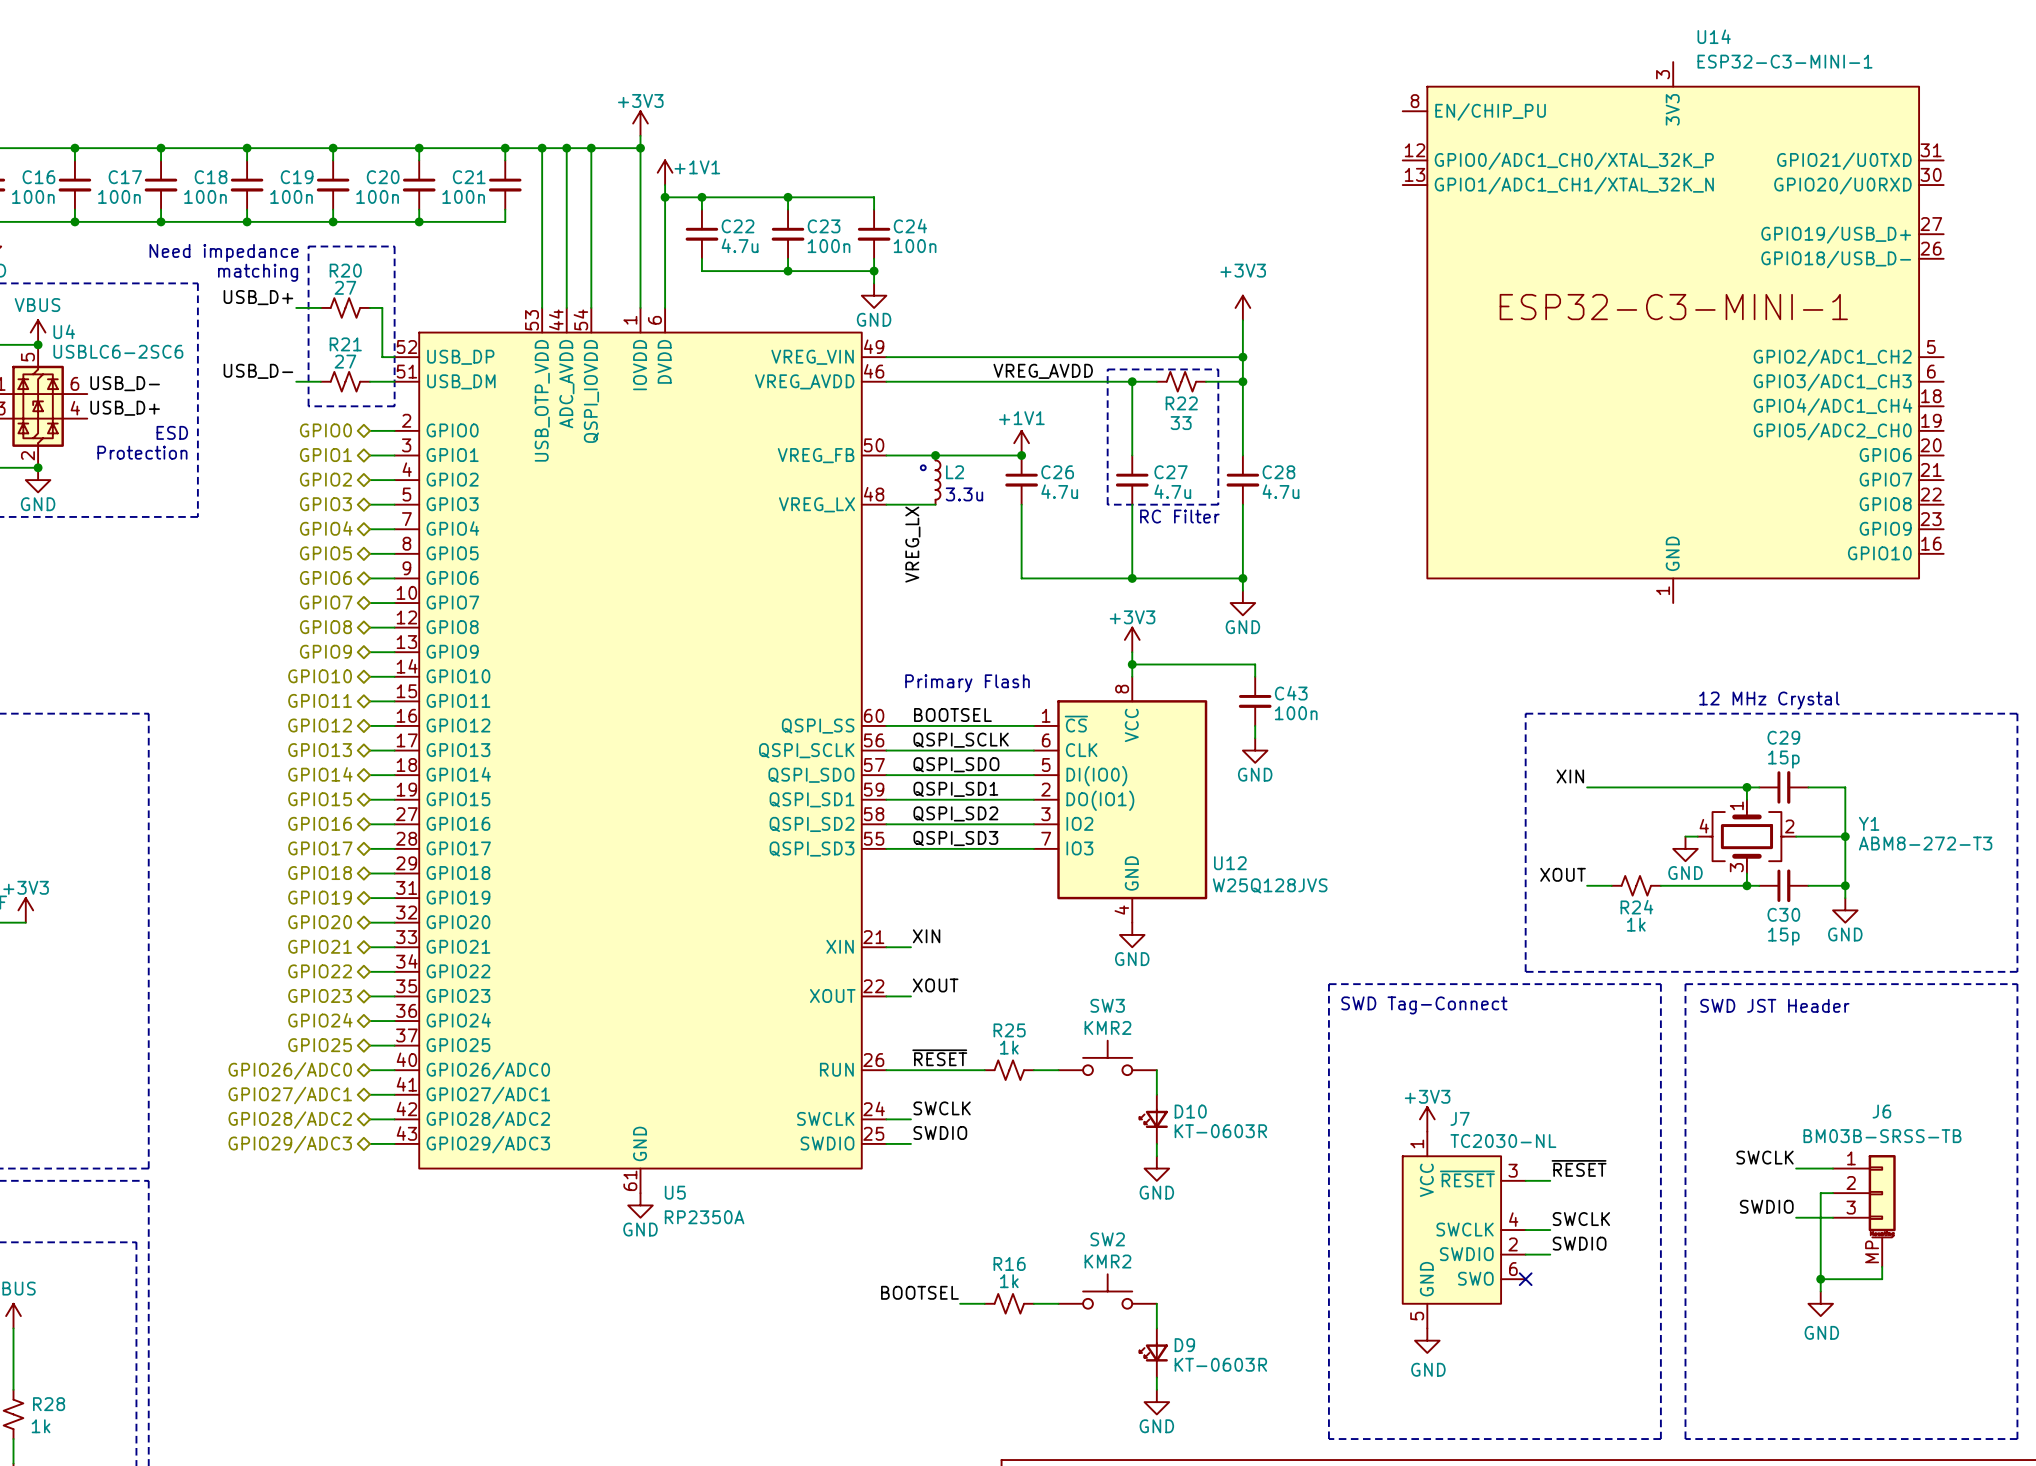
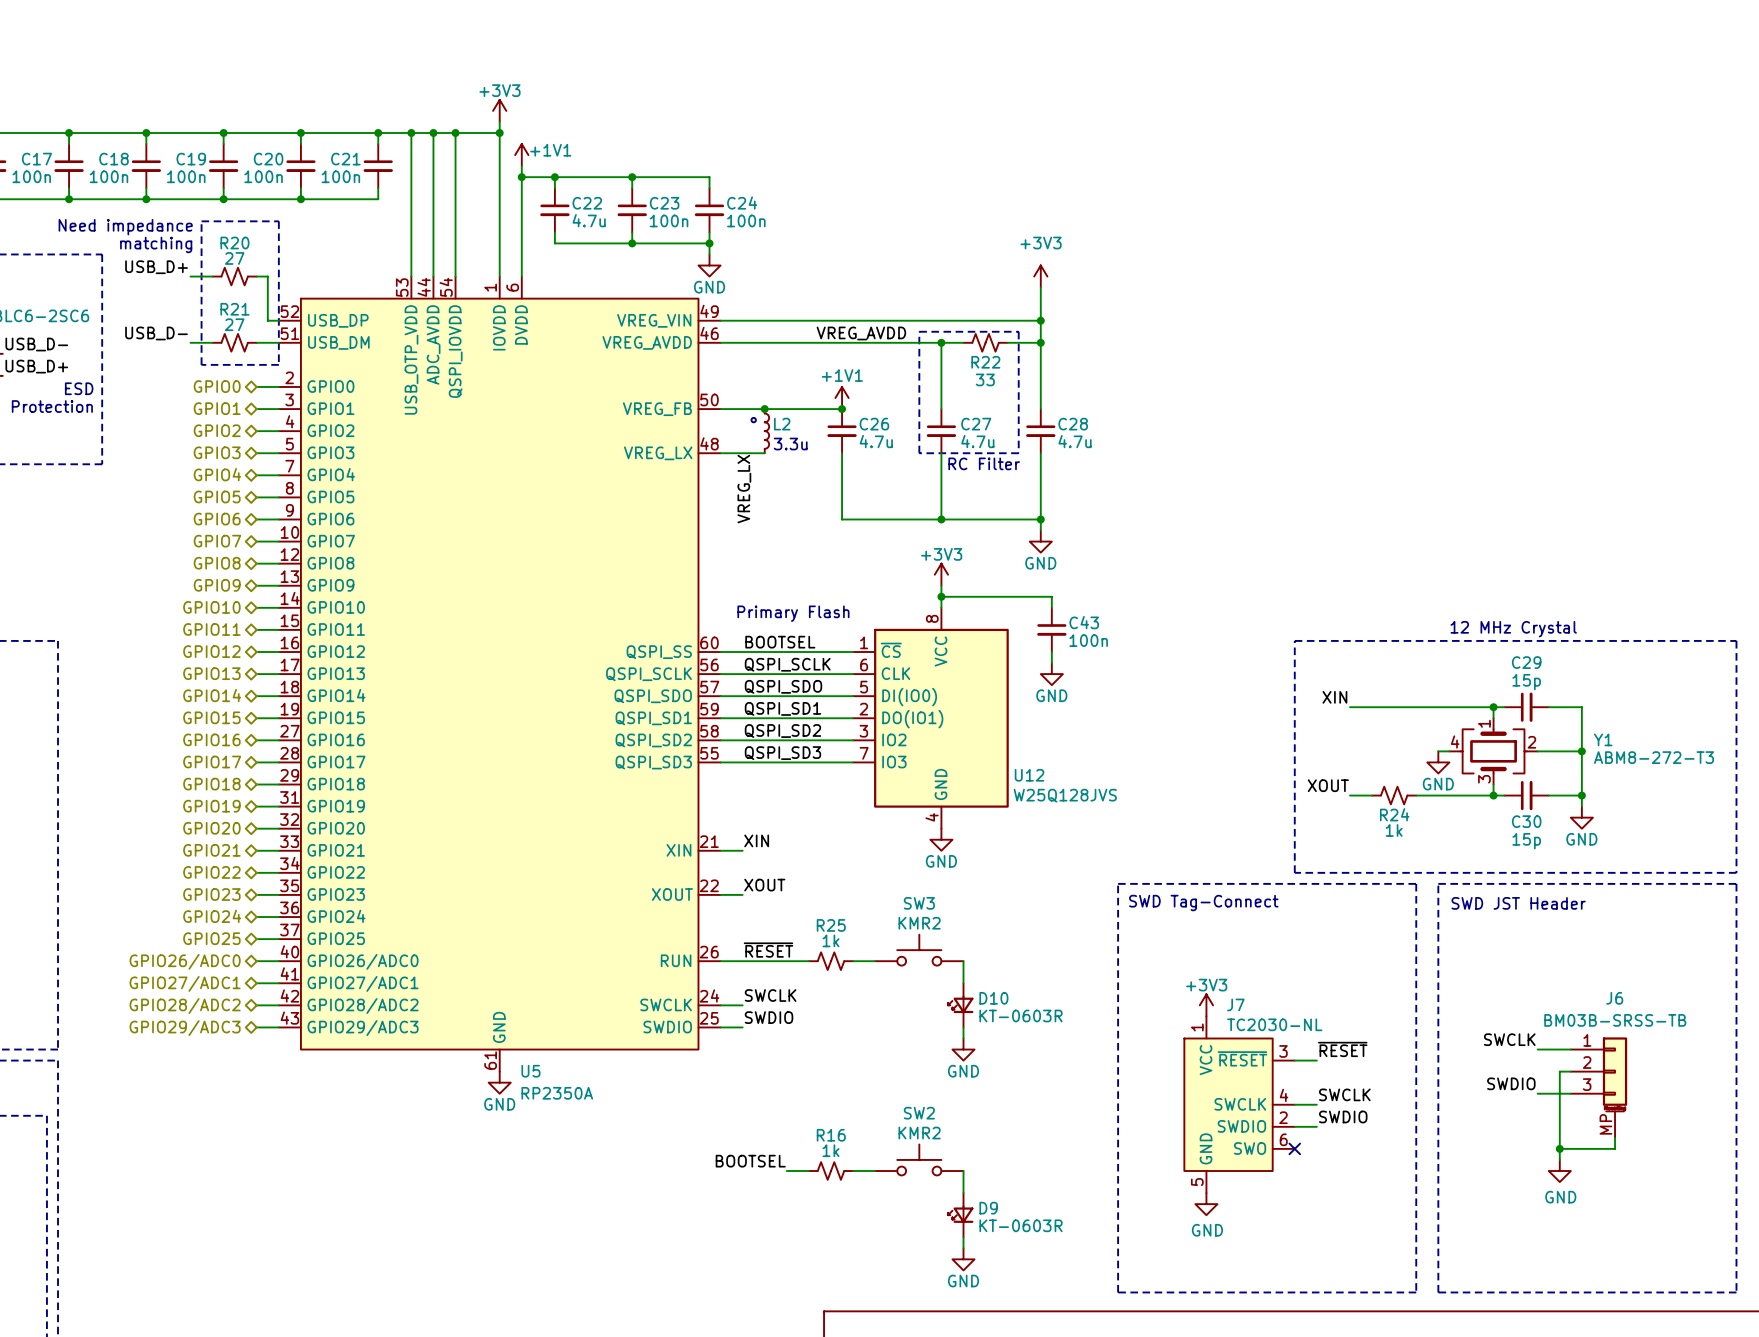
U14: ESP32-C3-MINI-1 (1673, 332) -> none

